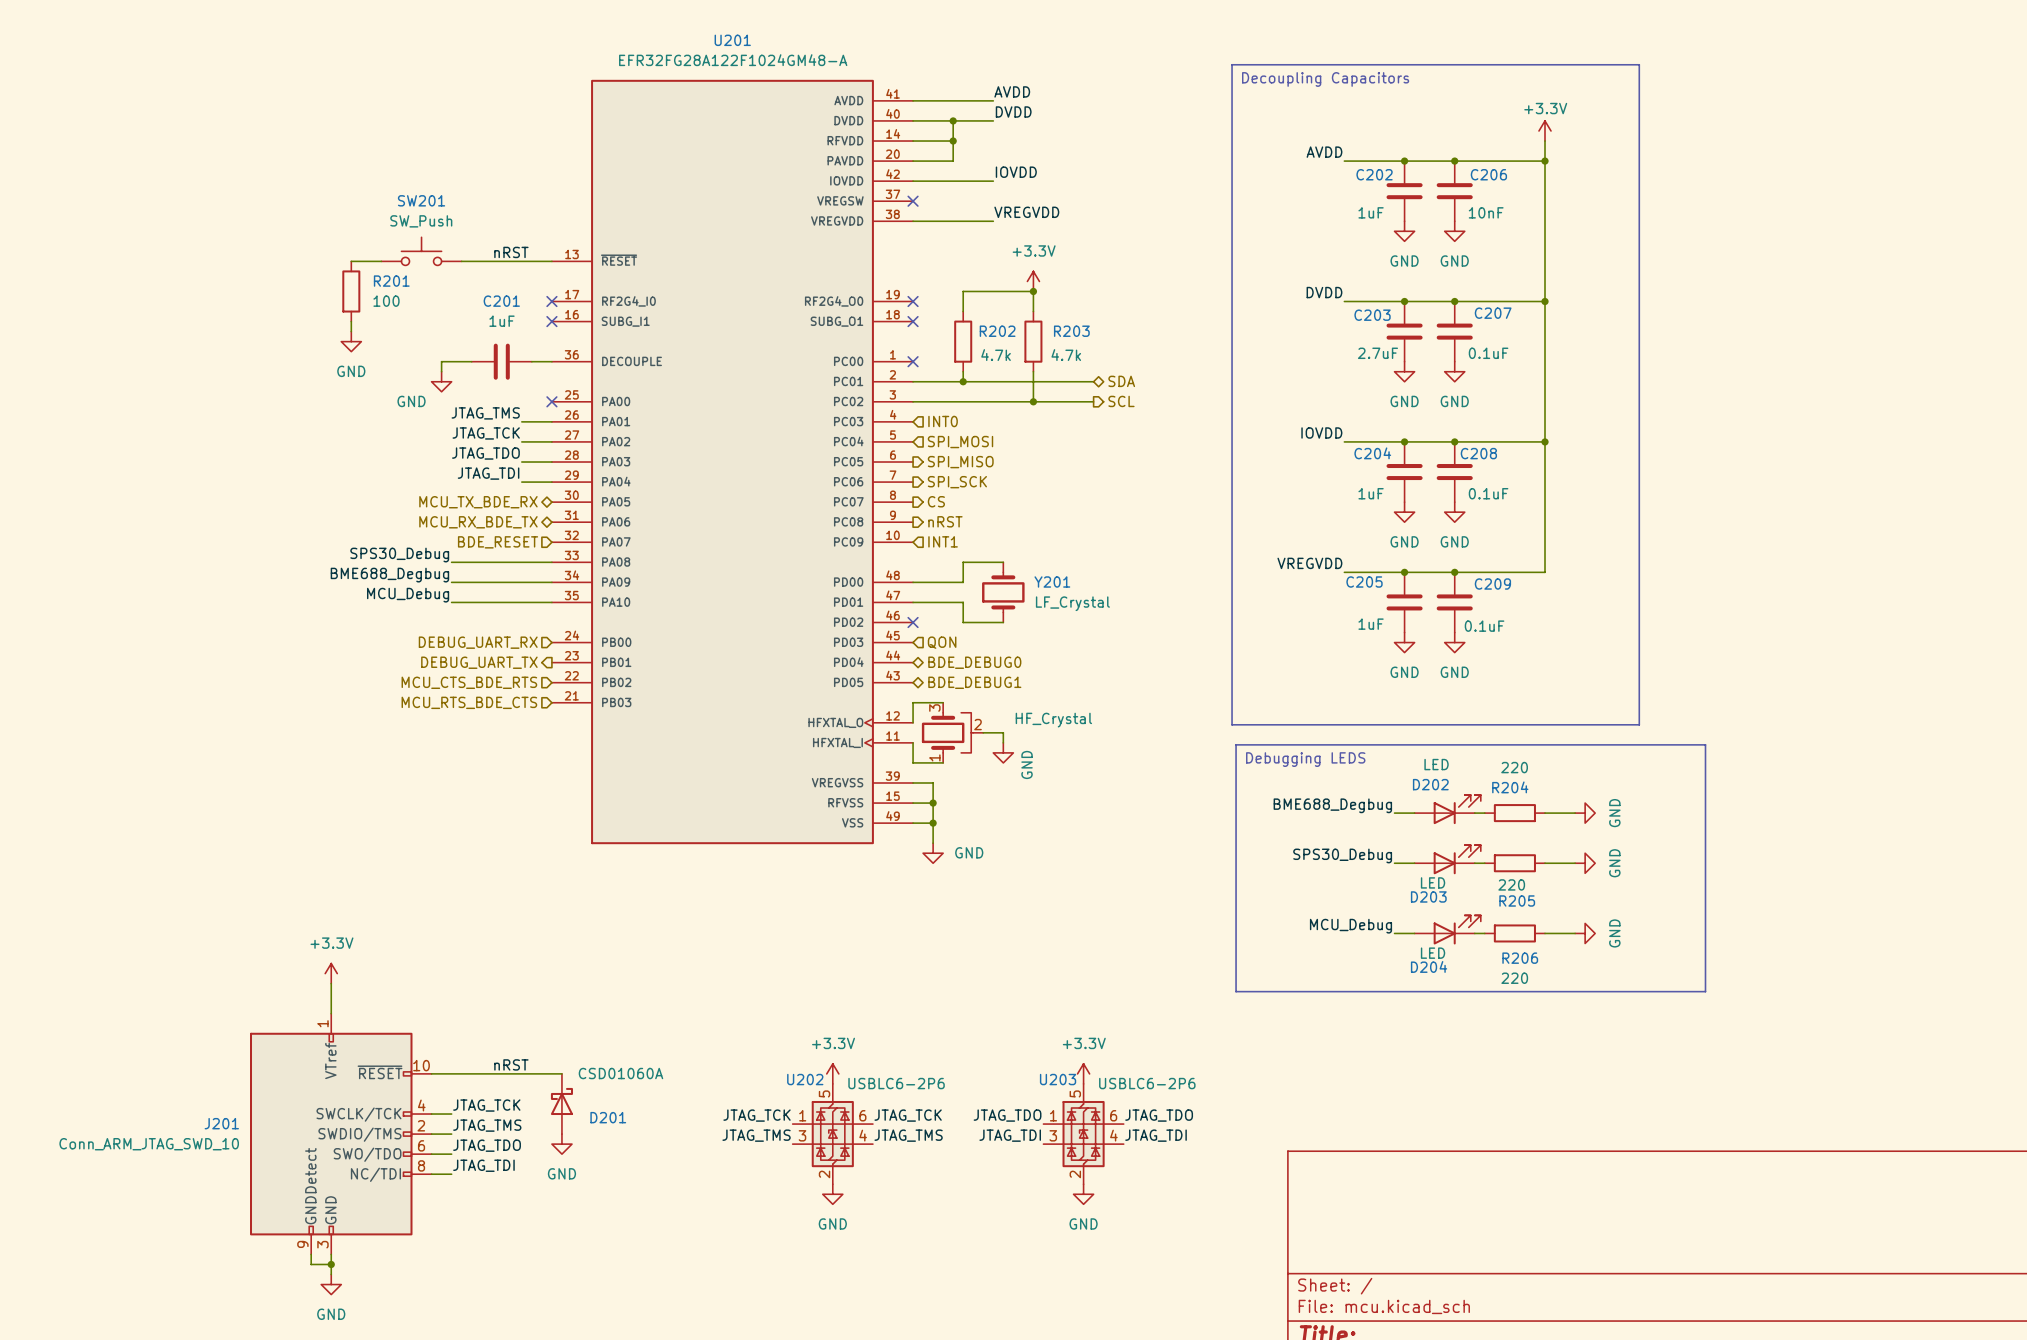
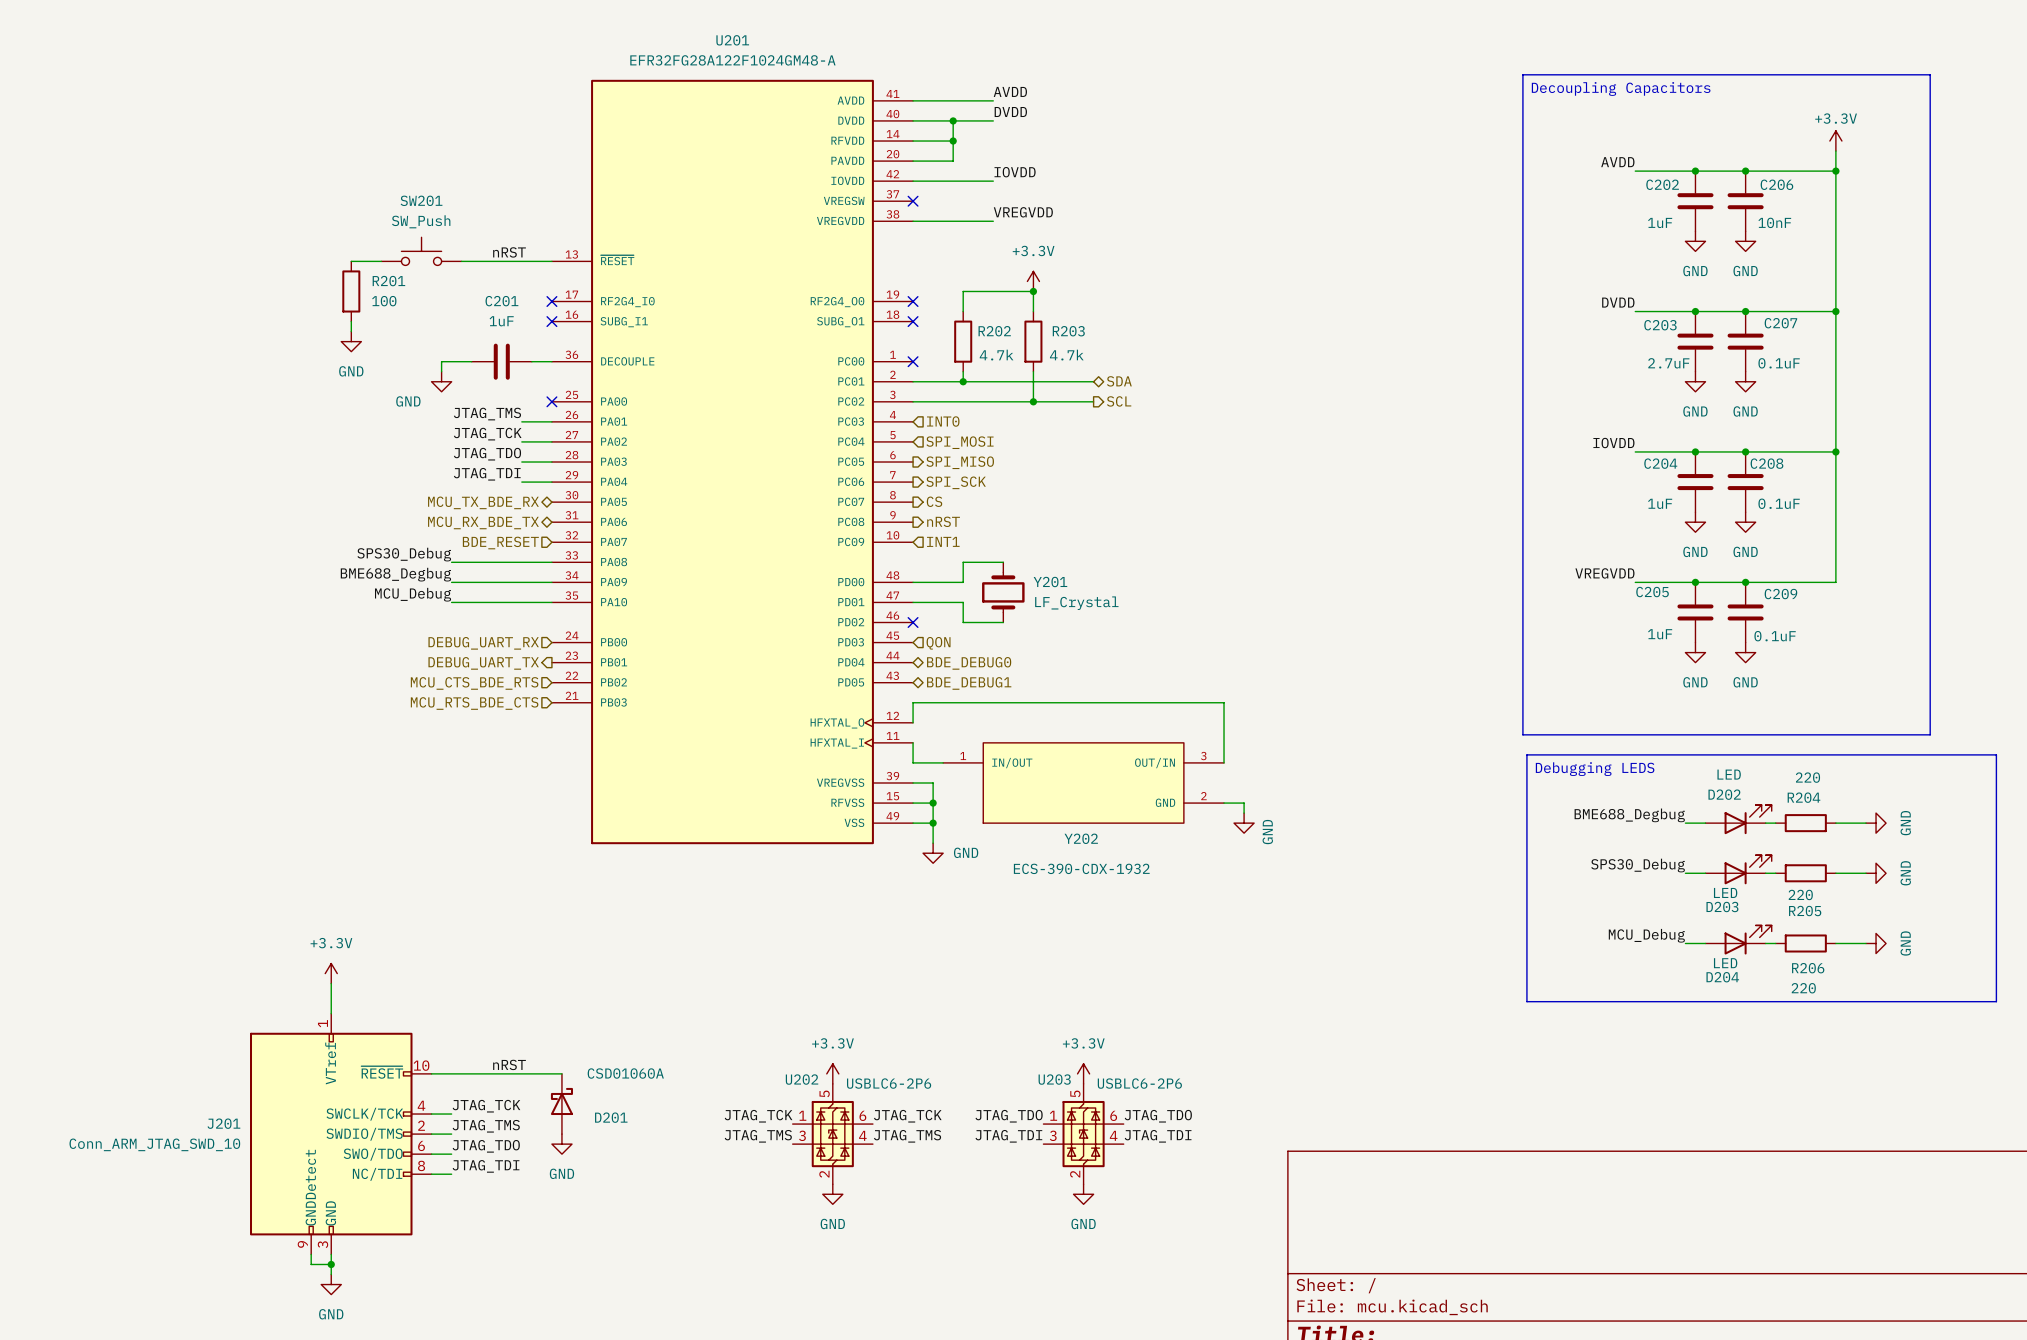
line: (1232, 64) (1639, 64) (1639, 724) (1232, 724) (1232, 64) -> none
line: none -> (1522, 74) (1930, 74) (1930, 734) (1522, 734) (1522, 74)
text: Decoupling Capacitors (1325, 79) -> none
text: none -> Decoupling Capacitors (1621, 88)
power symbol: +3.3V (1545, 130) -> none
wire: (1545, 141) (1545, 572) (1344, 572) -> none
power symbol: none -> +3.3V (1835, 141)
wire: none -> (1835, 151) (1835, 582) (1635, 582)
label: AVDD (1324, 152) -> none
wire: (1344, 161) (1545, 161) -> none
junction: (1404, 161) -> none
junction: (1454, 161) -> none
junction: (1545, 161) -> none
label: none -> AVDD (1617, 162)
wire: none -> (1635, 171) (1835, 171)
junction: none -> (1695, 171)
junction: none -> (1745, 171)
junction: none -> (1835, 171)
C202 position: (1404, 191) -> (1695, 201)
C206 position: (1454, 191) -> (1745, 201)
power symbol: GND (1404, 231) -> none
power symbol: GND (1454, 231) -> none
power symbol: none -> GND (1695, 241)
power symbol: none -> GND (1745, 241)
label: DVDD (1324, 292) -> none
wire: (1344, 301) (1545, 301) -> none
junction: (1404, 301) -> none
junction: (1454, 301) -> none
junction: (1545, 301) -> none
label: none -> DVDD (1618, 302)
wire: none -> (1635, 311) (1835, 311)
junction: none -> (1695, 311)
junction: none -> (1745, 311)
junction: none -> (1835, 311)
C203 position: (1404, 331) -> (1695, 341)
C207 position: (1454, 331) -> (1745, 341)
power symbol: GND (1404, 371) -> none
power symbol: GND (1454, 371) -> none
power symbol: none -> GND (1695, 381)
power symbol: none -> GND (1745, 381)
label: IOVDD (1321, 432) -> none
wire: (1344, 441) (1545, 441) -> none
junction: (1404, 441) -> none
junction: (1454, 441) -> none
junction: (1545, 441) -> none
label: none -> IOVDD (1613, 443)
wire: none -> (1635, 451) (1835, 451)
junction: none -> (1695, 451)
junction: none -> (1745, 451)
junction: none -> (1835, 451)
C204 position: (1404, 472) -> (1695, 482)
C208 position: (1454, 472) -> (1745, 482)
power symbol: GND (1404, 512) -> none
power symbol: GND (1454, 512) -> none
power symbol: none -> GND (1695, 522)
power symbol: none -> GND (1745, 522)
label: VREGVDD (1309, 563) -> none
junction: (1404, 572) -> none
junction: (1454, 572) -> none
label: none -> VREGVDD (1604, 573)
junction: none -> (1695, 582)
junction: none -> (1745, 582)
C205 position: (1404, 602) -> (1695, 612)
C209 position: (1454, 602) -> (1745, 612)
power symbol: GND (1404, 642) -> none
power symbol: GND (1454, 642) -> none
power symbol: none -> GND (1695, 652)
power symbol: none -> GND (1745, 652)
wire: none -> (943, 702) (1224, 702) (1224, 762)
part: HF_Crystal (952, 732) -> none
wire: (983, 732) (1003, 732) (1003, 742) -> none
line: (1236, 744) (1705, 744) (1705, 991) (1236, 991) (1236, 744) -> none
power symbol: GND (1003, 752) -> none
line: none -> (1526, 754) (1996, 754) (1996, 1001) (1526, 1001) (1526, 754)
text: Debugging LEDS (1305, 759) -> none
text: none -> Debugging LEDS (1595, 769)
Y202: none -> ECS-390-CDX-1932 (1083, 782)
wire: none -> (1224, 803) (1244, 803) (1244, 813)
label: BME688_Degbug (1332, 805) -> none
D202 position: (1447, 809) -> (1738, 819)
wire: (1394, 813) (1414, 813) -> none
wire: (1474, 813) (1484, 813) -> none
R204 position: (1514, 813) -> (1805, 823)
wire: (1545, 813) (1575, 813) -> none
power symbol: GND (1585, 813) -> none
label: none -> BME688_Degbug (1629, 815)
power symbol: none -> GND (1244, 823)
wire: none -> (1685, 823) (1705, 823)
wire: none -> (1765, 823) (1775, 823)
wire: none -> (1835, 823) (1865, 823)
power symbol: none -> GND (1876, 823)
label: SPS30_Debug (1342, 855) -> none
D203 position: (1447, 859) -> (1738, 869)
wire: (1394, 863) (1414, 863) -> none
wire: (1474, 863) (1484, 863) -> none
R205 position: (1514, 863) -> (1805, 873)
wire: (1545, 863) (1575, 863) -> none
power symbol: GND (1585, 863) -> none
label: none -> SPS30_Debug (1638, 865)
wire: none -> (1685, 873) (1705, 873)
wire: none -> (1765, 873) (1775, 873)
wire: none -> (1835, 873) (1865, 873)
power symbol: none -> GND (1876, 873)
label: MCU_Debug (1350, 926) -> none
D204 position: (1447, 929) -> (1738, 939)
wire: (1394, 933) (1414, 933) -> none
wire: (1474, 933) (1484, 933) -> none
R206 position: (1514, 933) -> (1805, 943)
wire: (1545, 933) (1575, 933) -> none
power symbol: GND (1585, 933) -> none
label: none -> MCU_Debug (1646, 935)
wire: none -> (1685, 943) (1705, 943)
wire: none -> (1765, 943) (1775, 943)
wire: none -> (1835, 943) (1865, 943)
power symbol: none -> GND (1876, 943)

